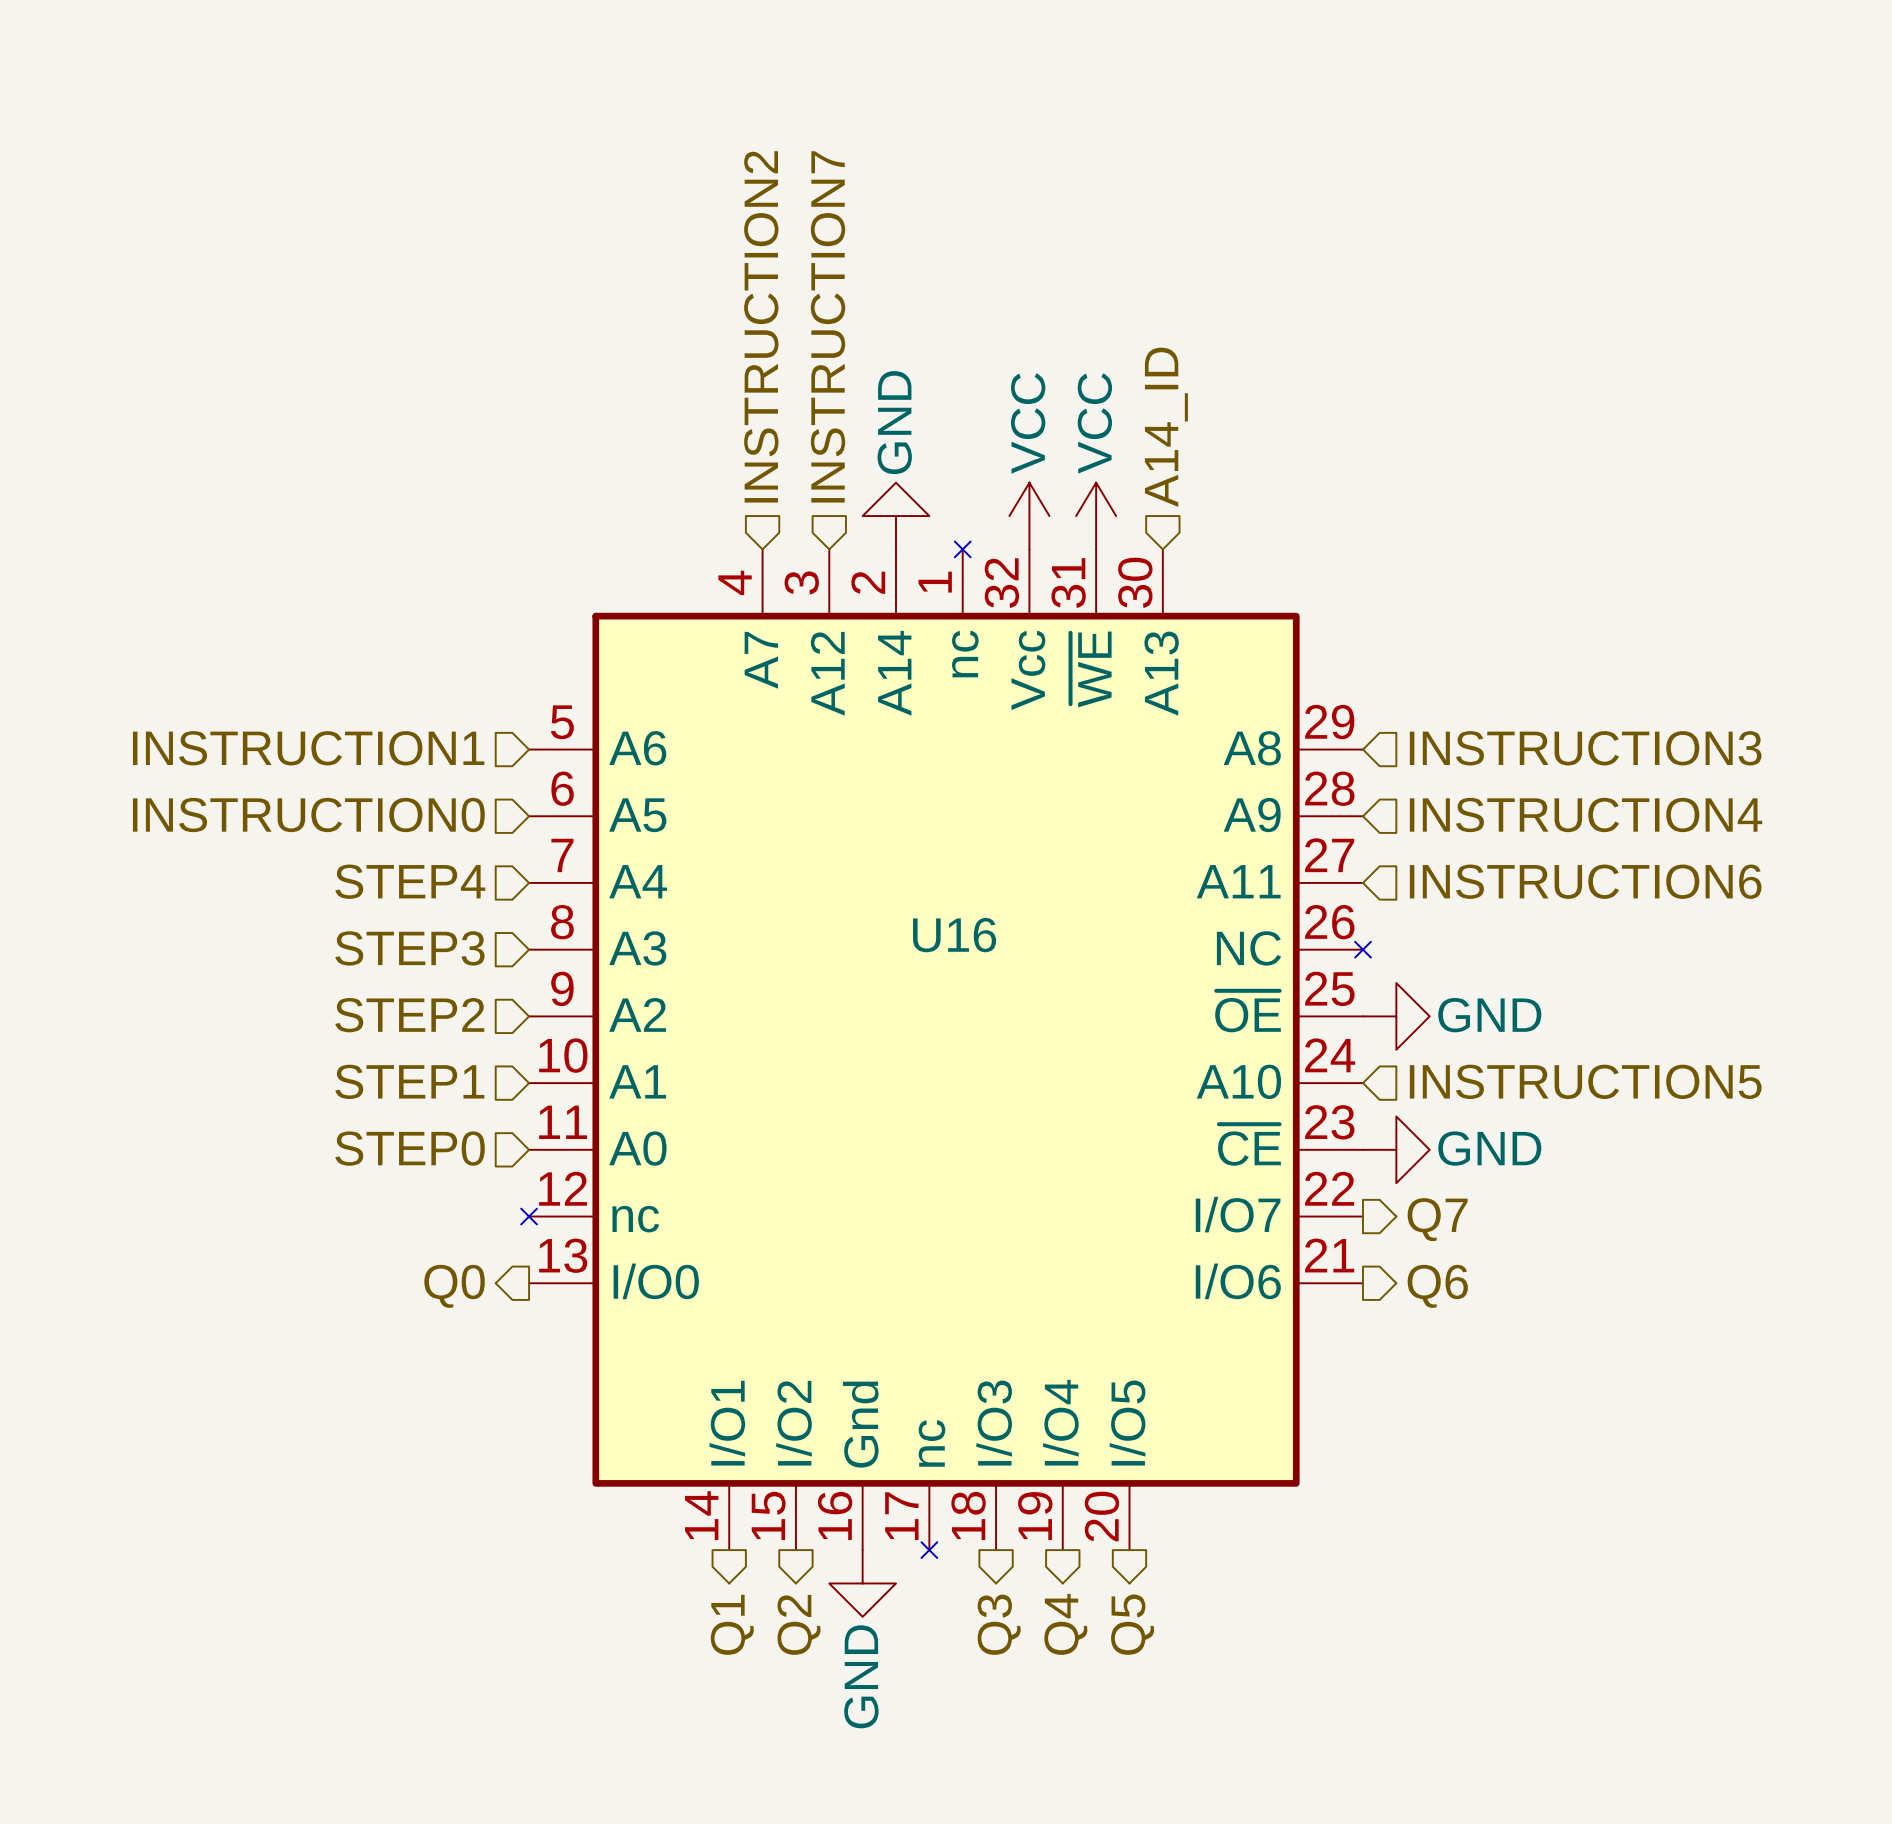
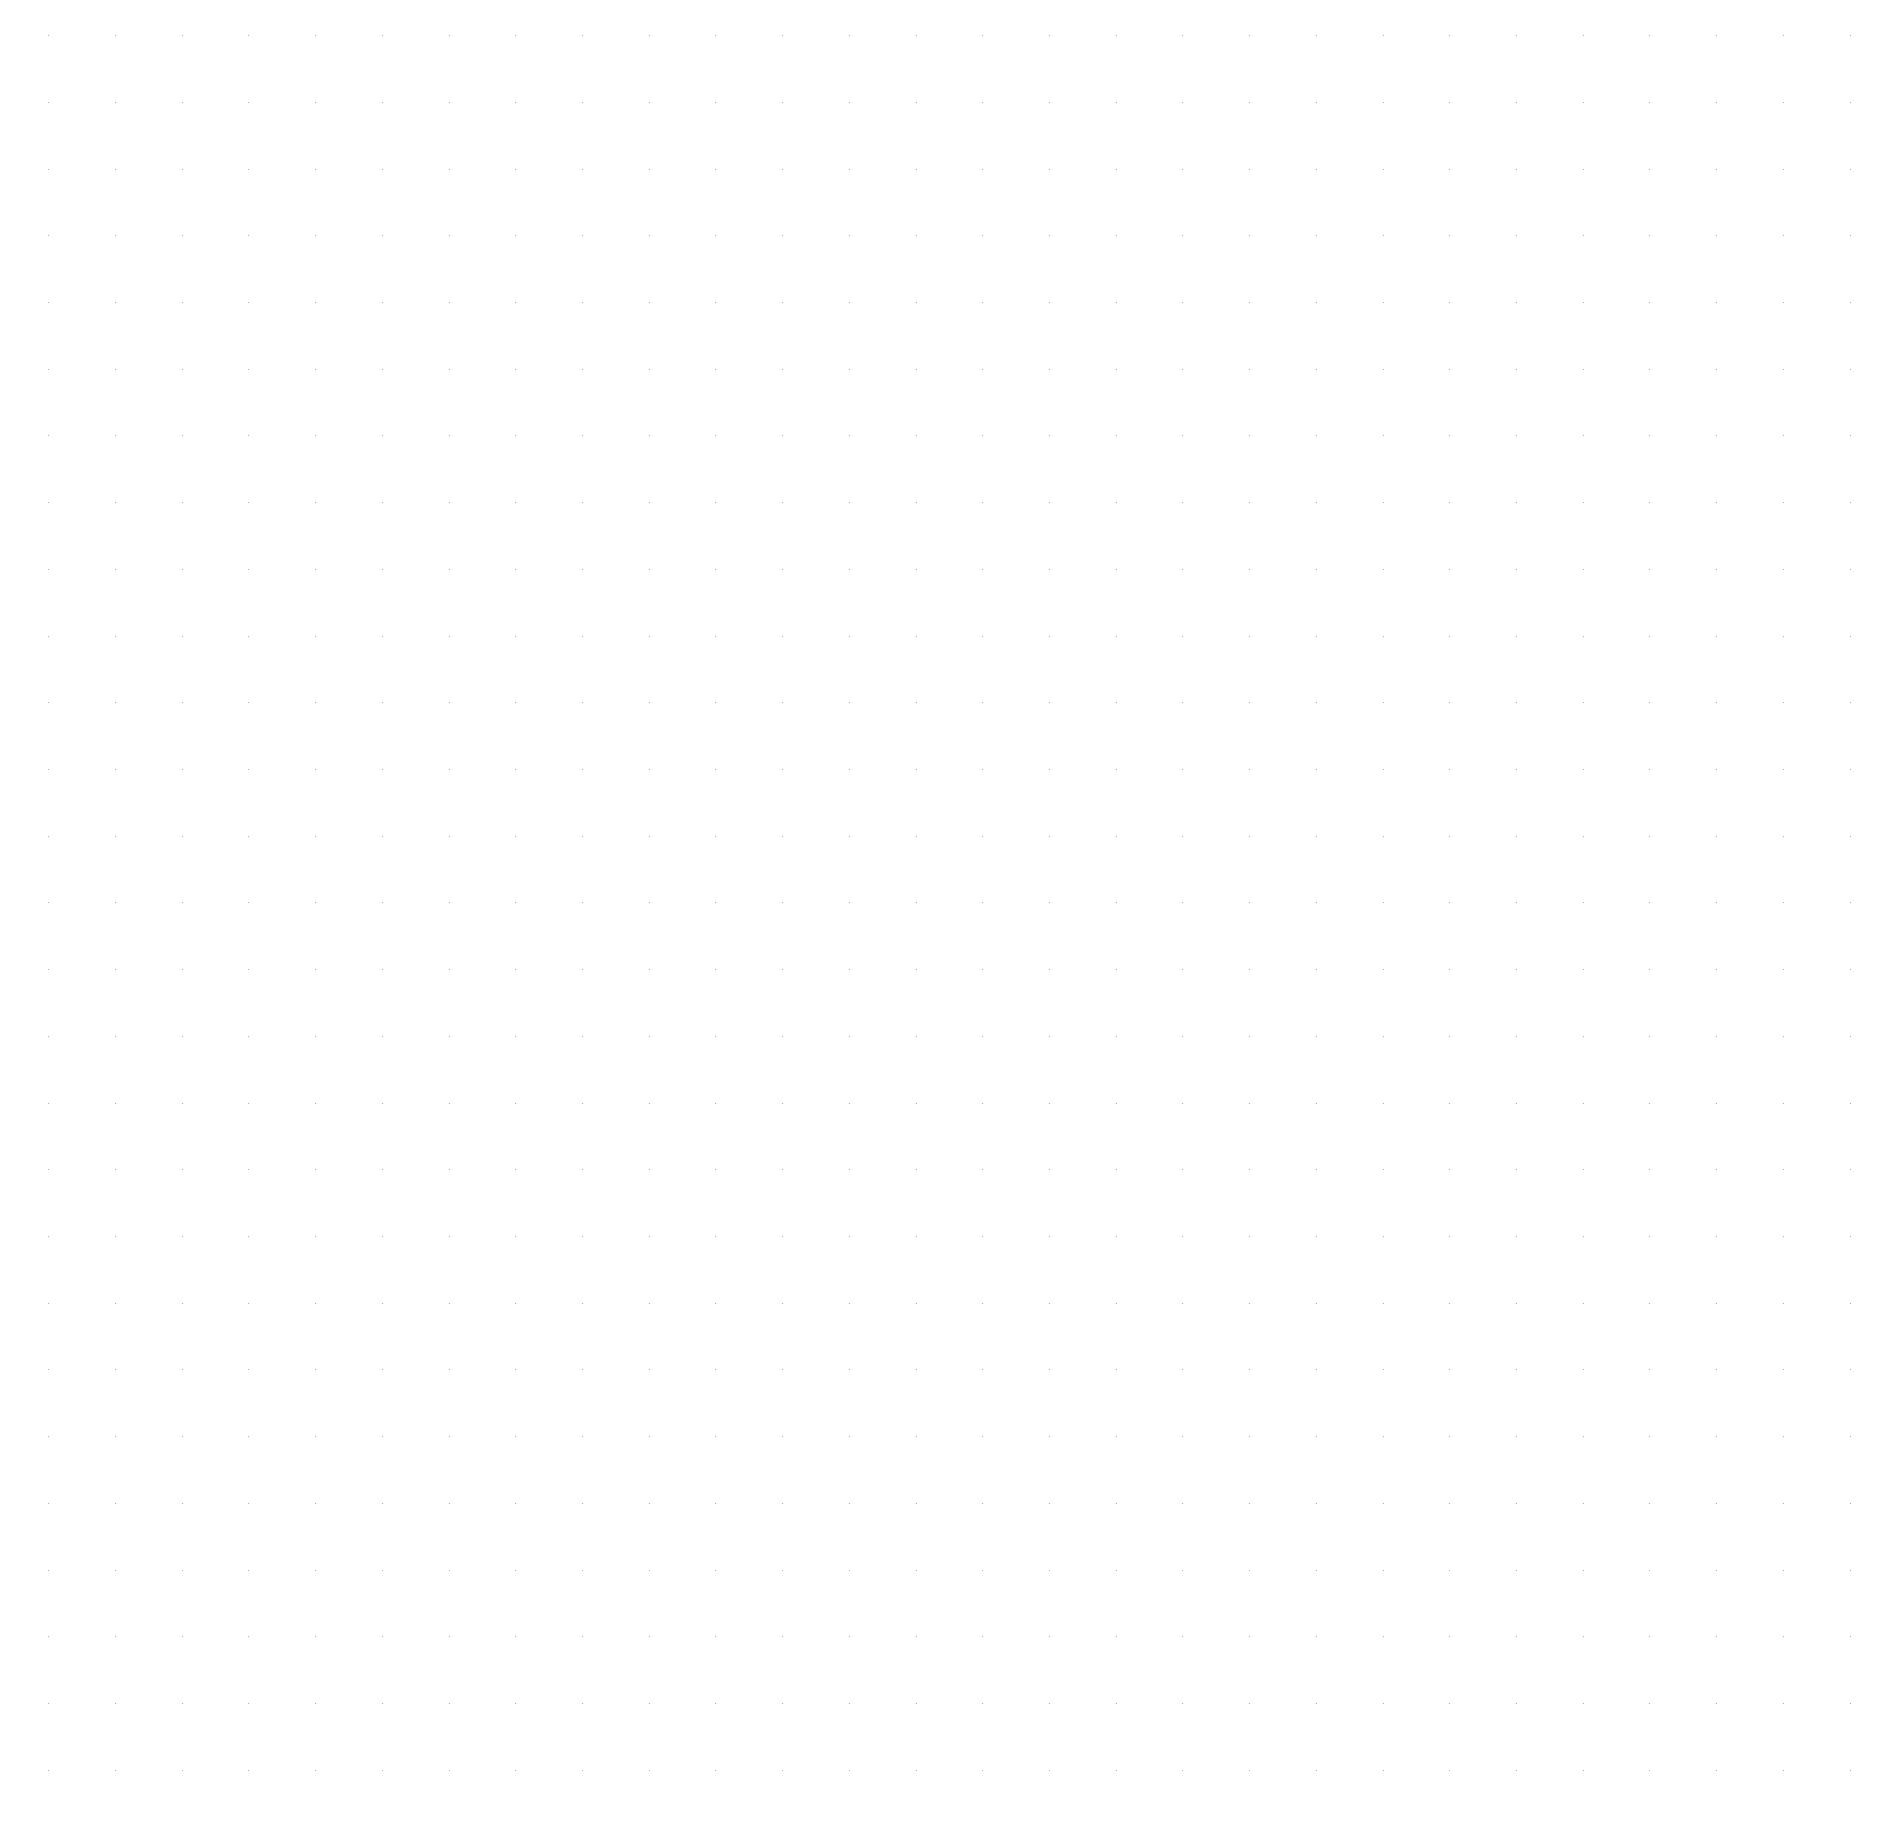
hierarchical label: INSTRUCTION2 (761, 326) -> none
hierarchical label: INSTRUCTION7 (828, 326) -> none
hierarchical label: A14_ID (1166, 427) -> none
power symbol: GND (896, 516) -> none
power symbol: VCC (1029, 516) -> none
power symbol: VCC (1096, 516) -> none
hierarchical label: INSTRUCTION1 (308, 748) -> none
hierarchical label: INSTRUCTION3 (1585, 748) -> none
hierarchical label: INSTRUCTION0 (308, 815) -> none
hierarchical label: INSTRUCTION4 (1586, 815) -> none
hierarchical label: STEP4 (410, 881) -> none
hierarchical label: INSTRUCTION6 (1585, 881) -> none
hierarchical label: STEP3 (409, 948) -> none
hierarchical label: STEP2 (409, 1015) -> none
power symbol: GND (1396, 1016) -> none
U16: (946, 1049) -> none
hierarchical label: STEP1 (409, 1081) -> none
hierarchical label: INSTRUCTION5 (1585, 1081) -> none
hierarchical label: STEP0 (410, 1148) -> none
power symbol: GND (1396, 1149) -> none
hierarchical label: Q7 (1437, 1219) -> none
hierarchical label: Q0 (454, 1286) -> none
hierarchical label: Q6 (1437, 1286) -> none
power symbol: GND (862, 1583) -> none
hierarchical label: Q1 (732, 1624) -> none
hierarchical label: Q2 (799, 1624) -> none
hierarchical label: Q3 (999, 1624) -> none
hierarchical label: Q4 (1065, 1624) -> none
hierarchical label: Q5 (1132, 1624) -> none

